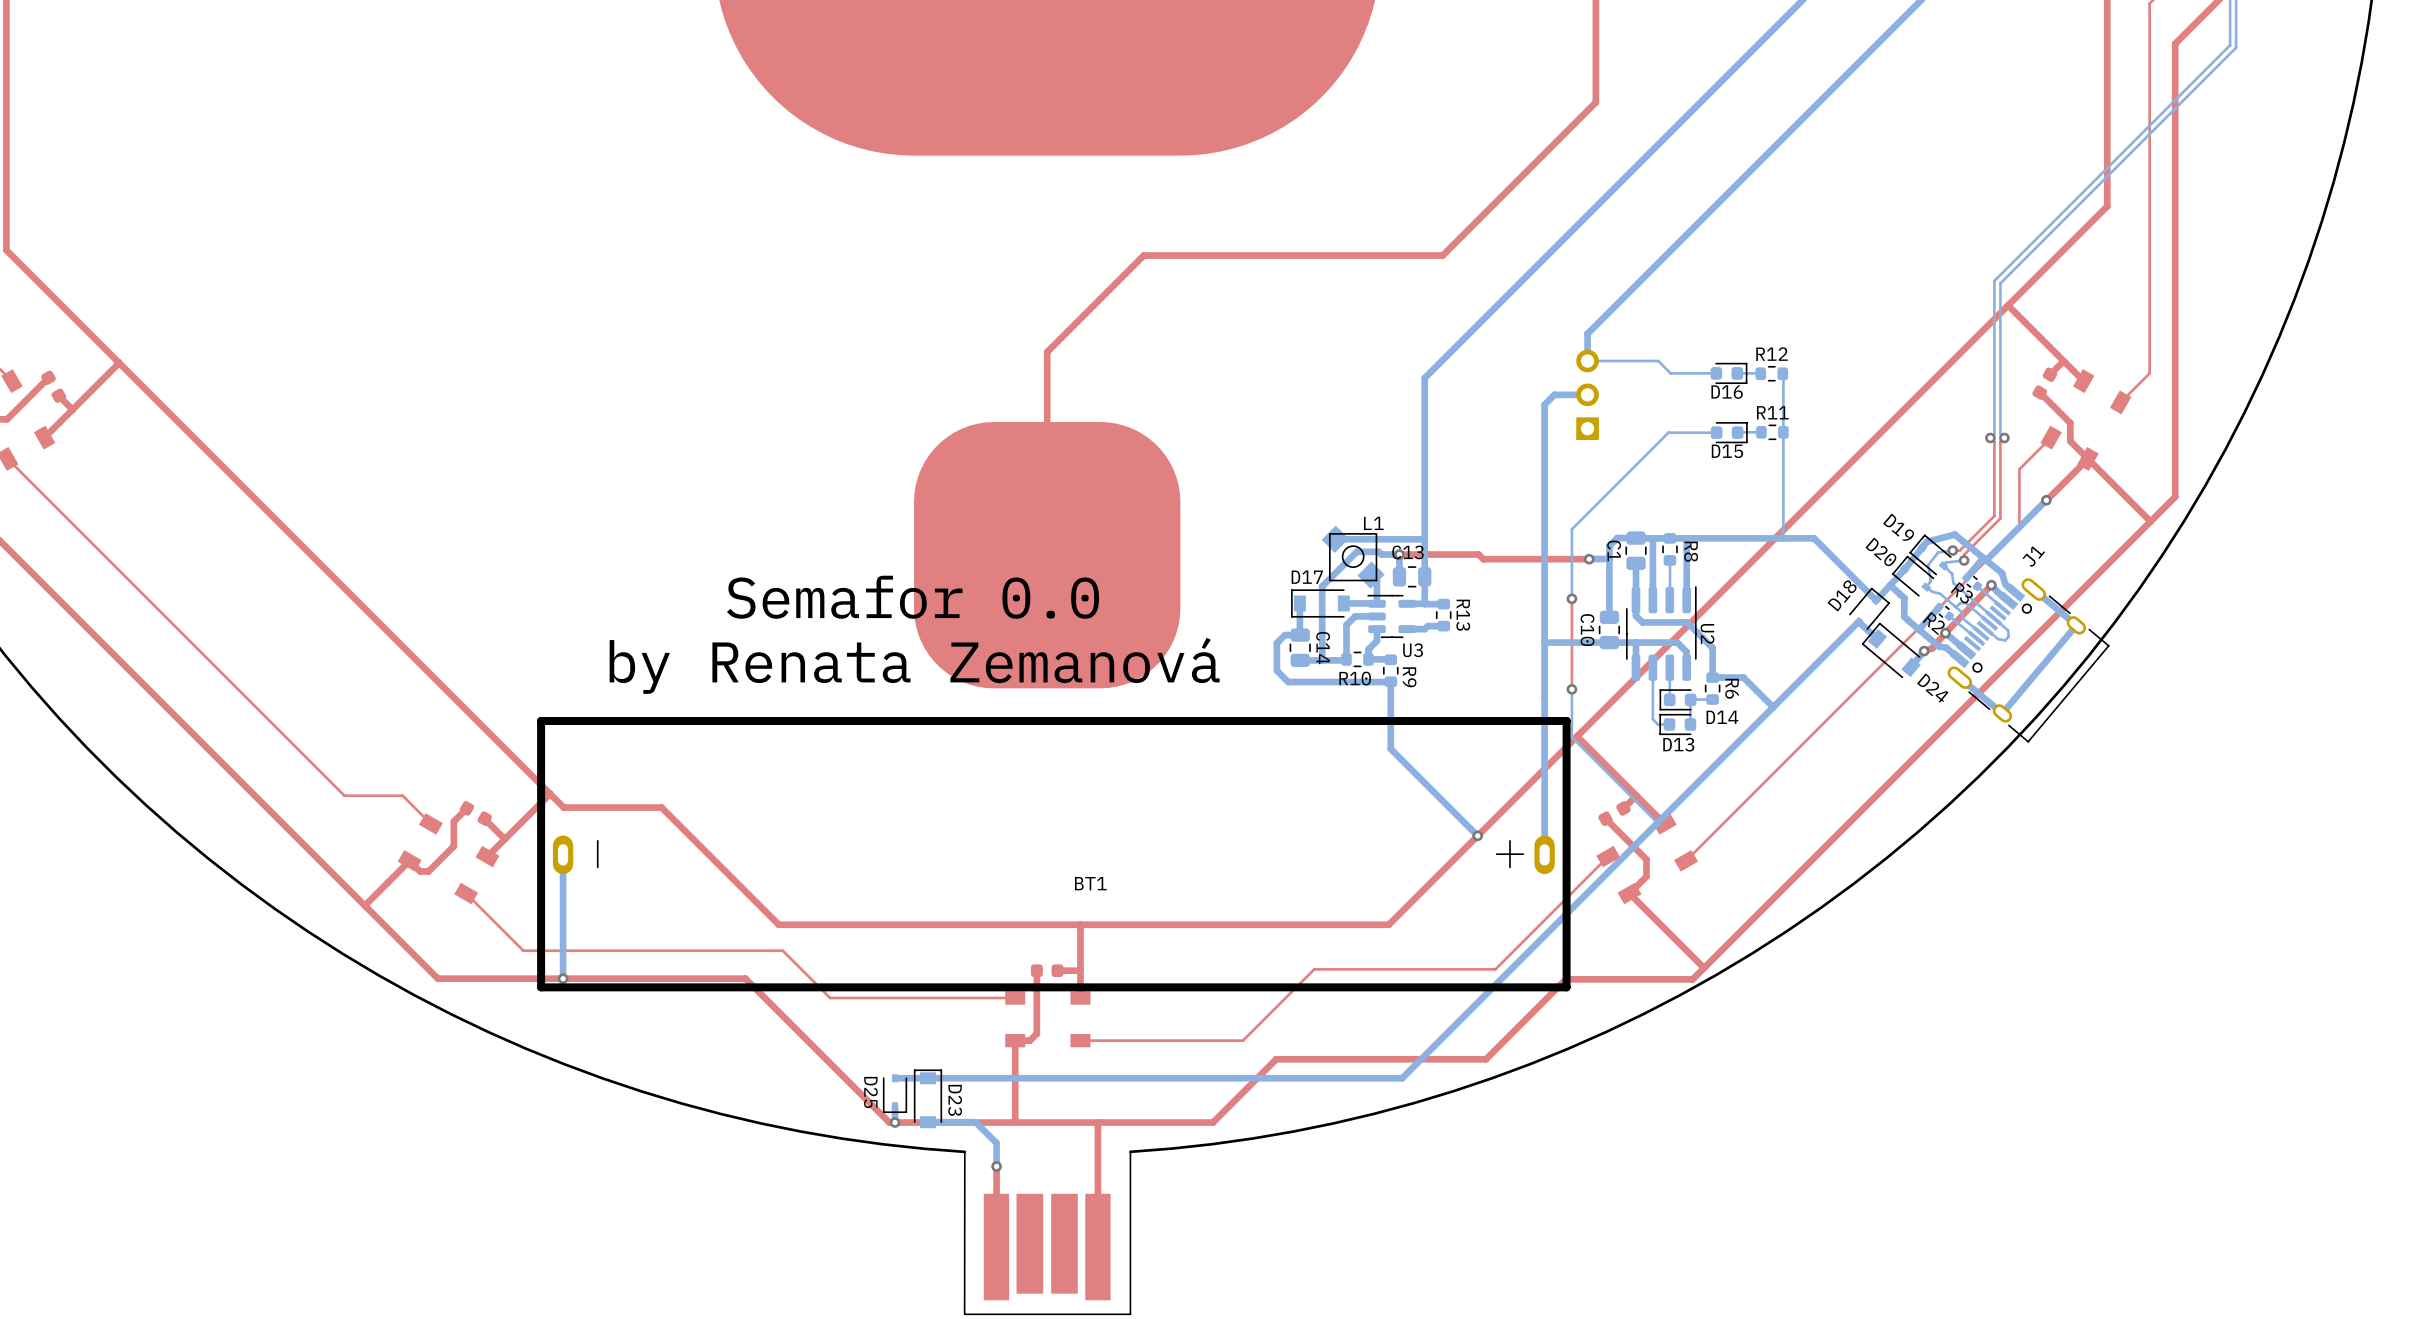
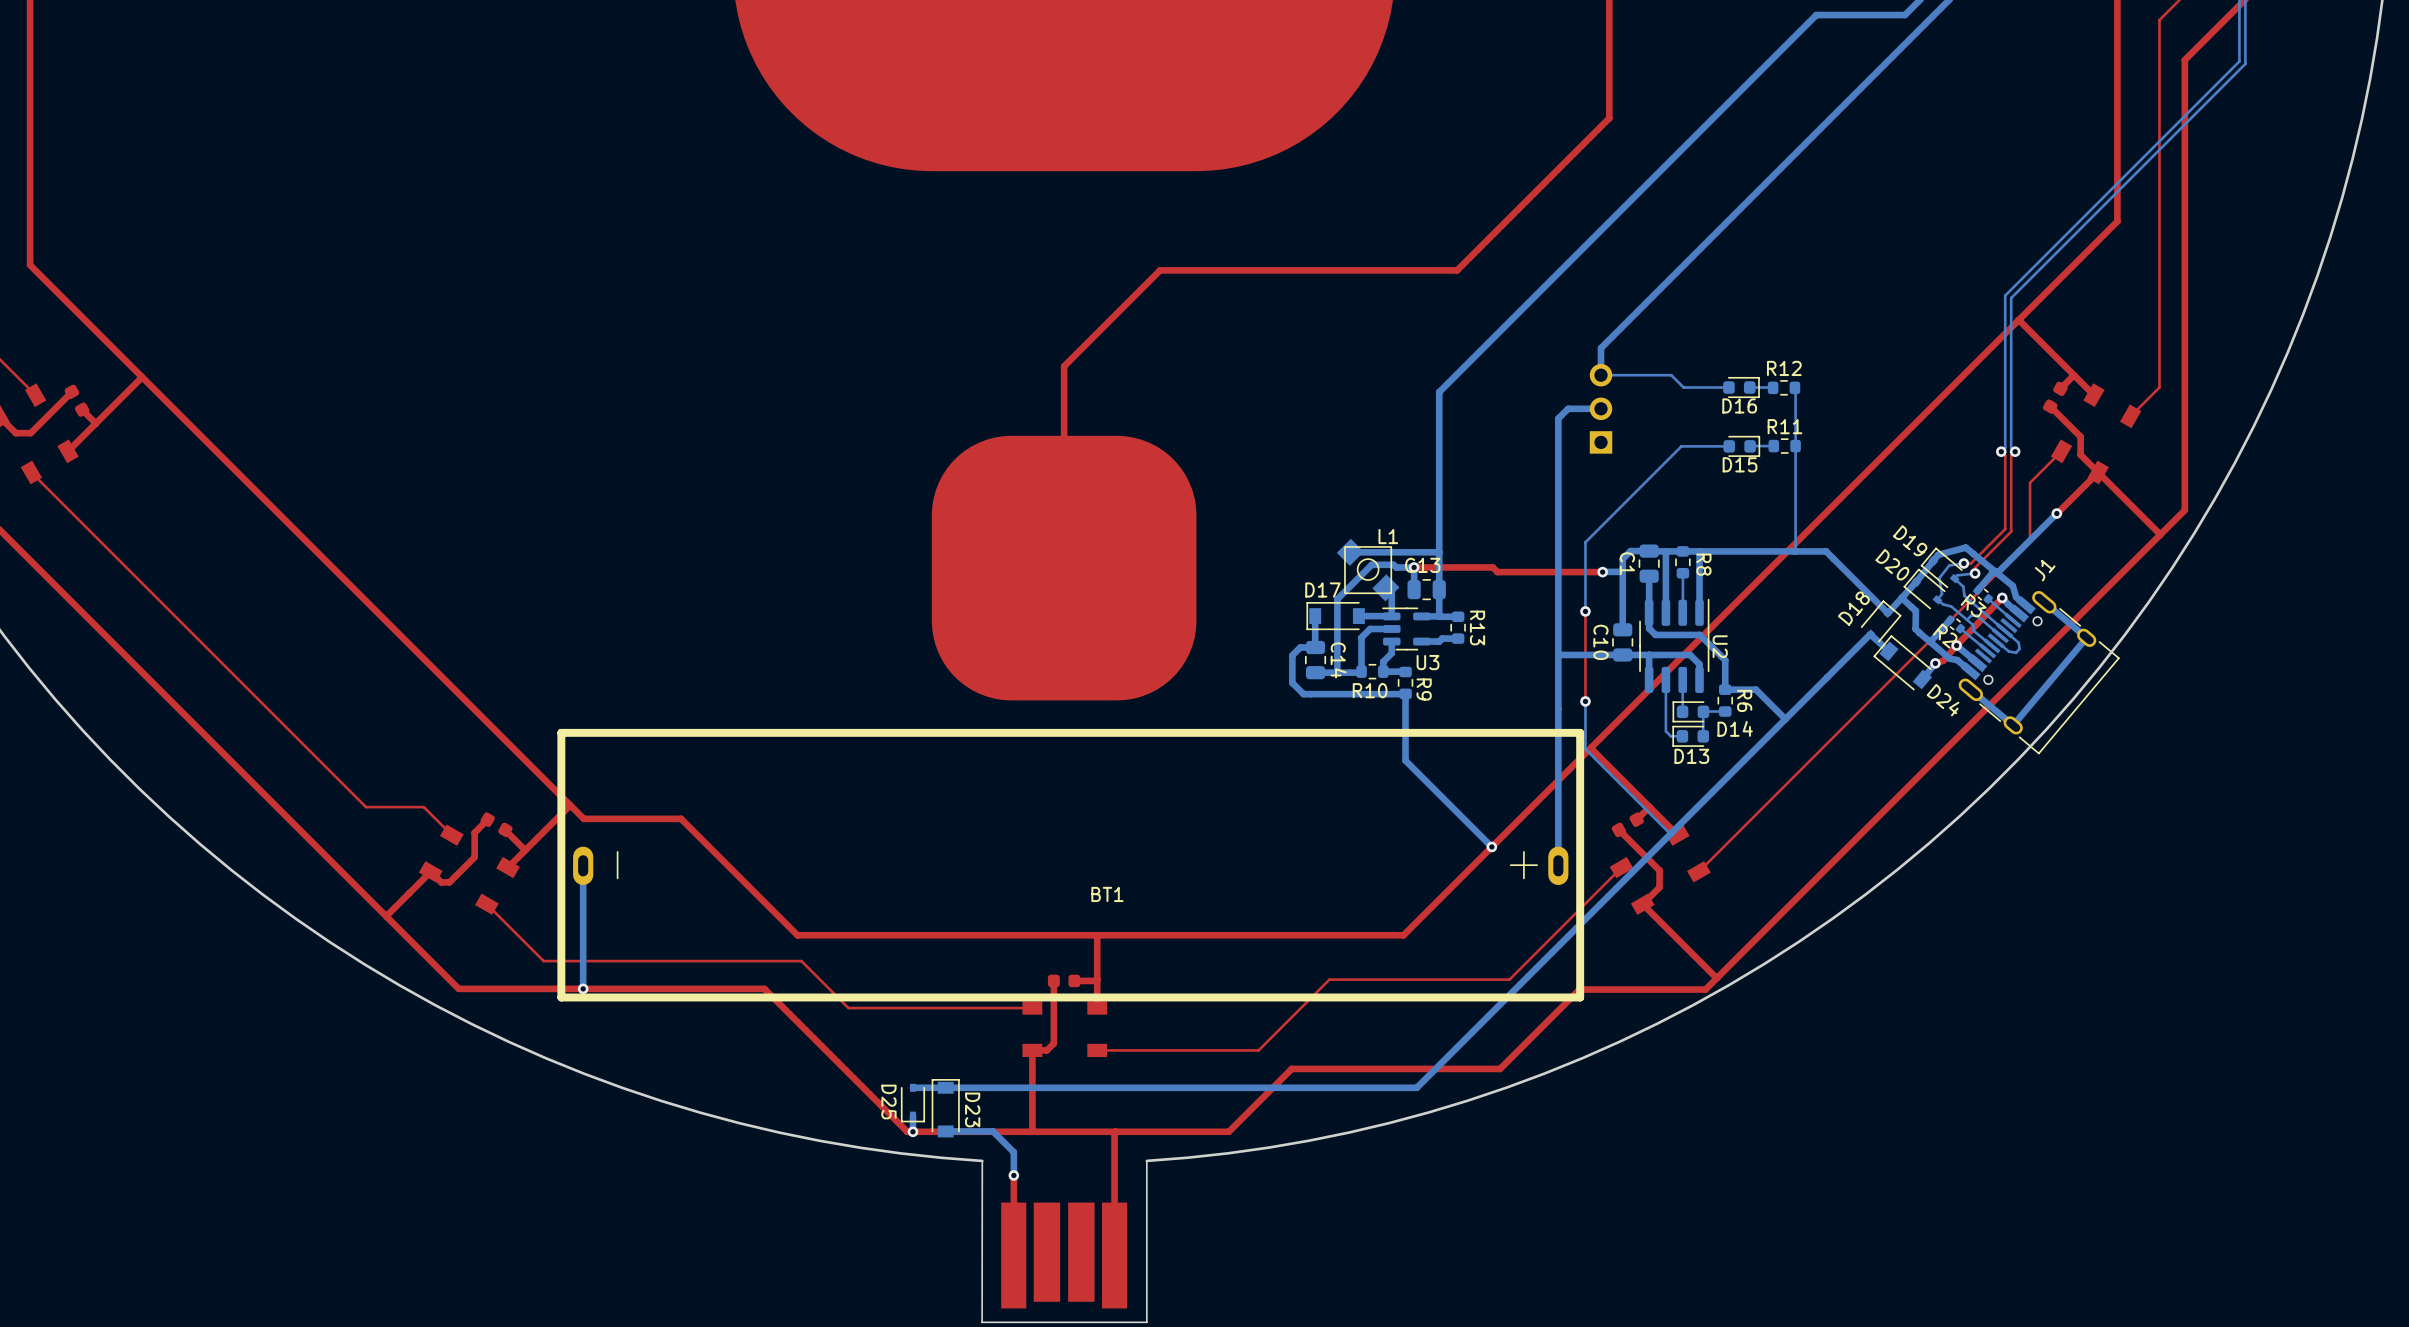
text: Semafor 0.0 (913, 597) -> none
text: by Renata Zemanová (914, 665) -> none

